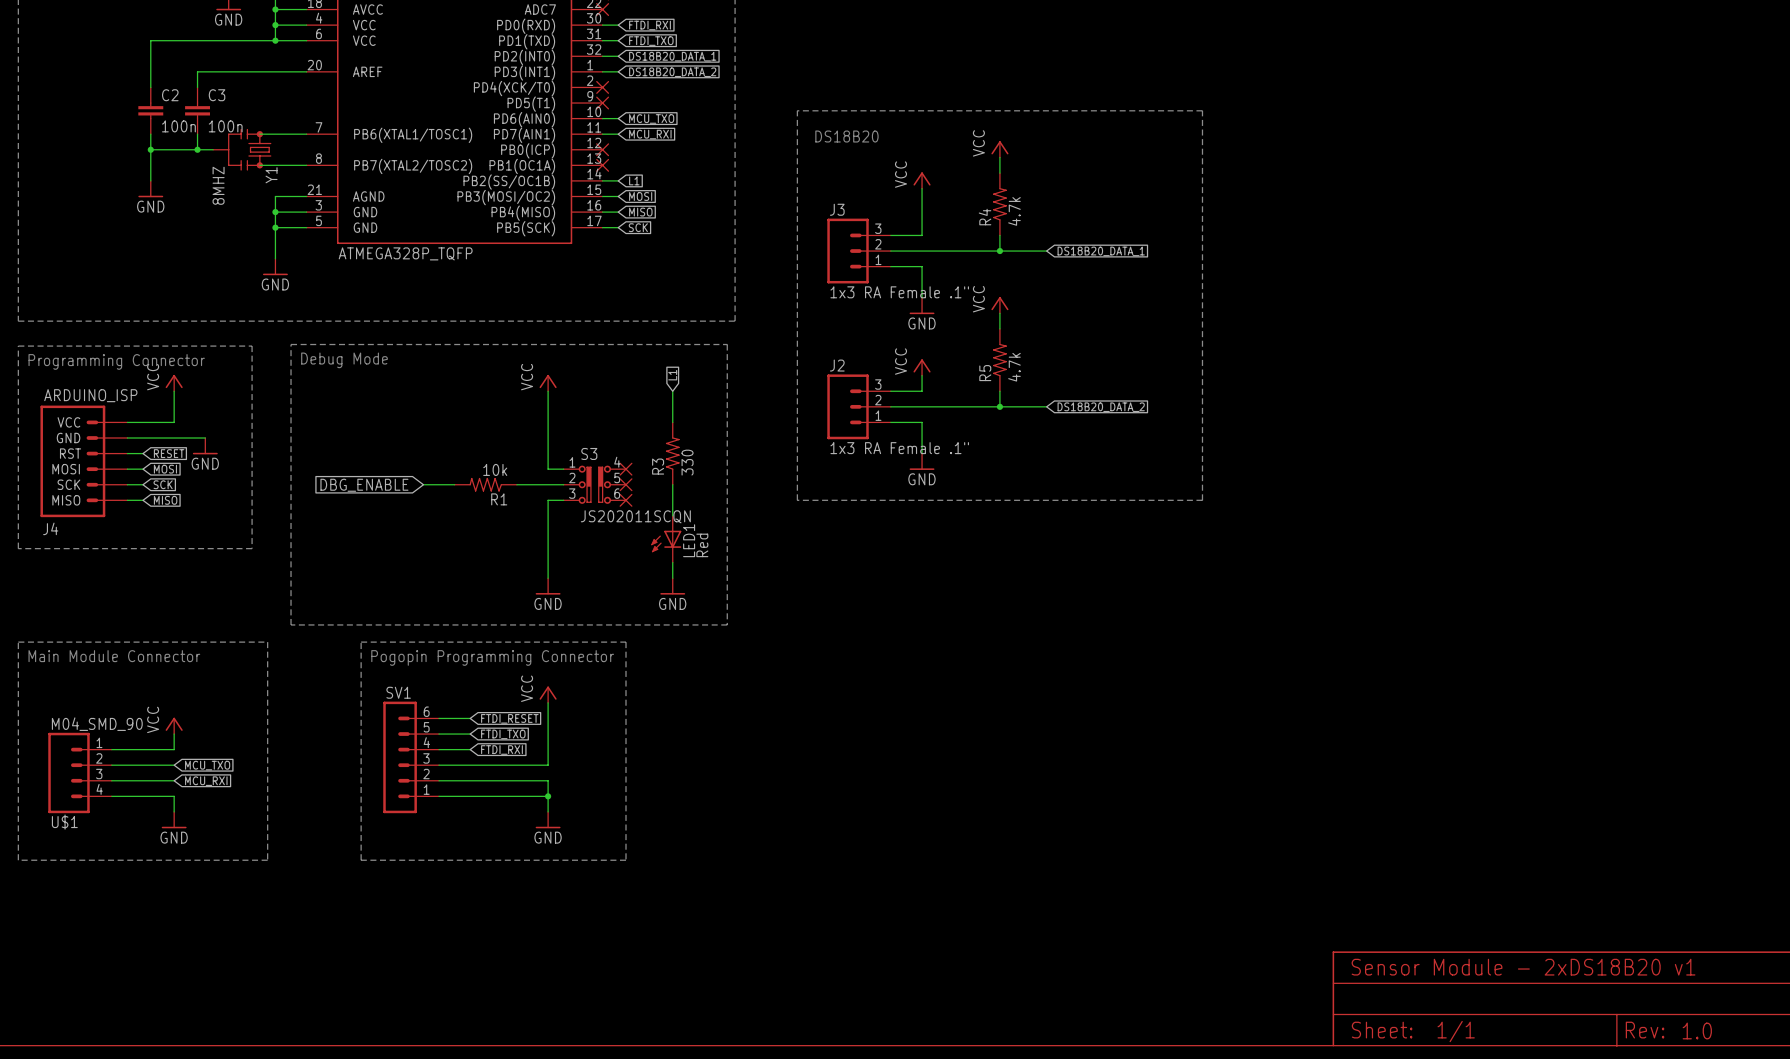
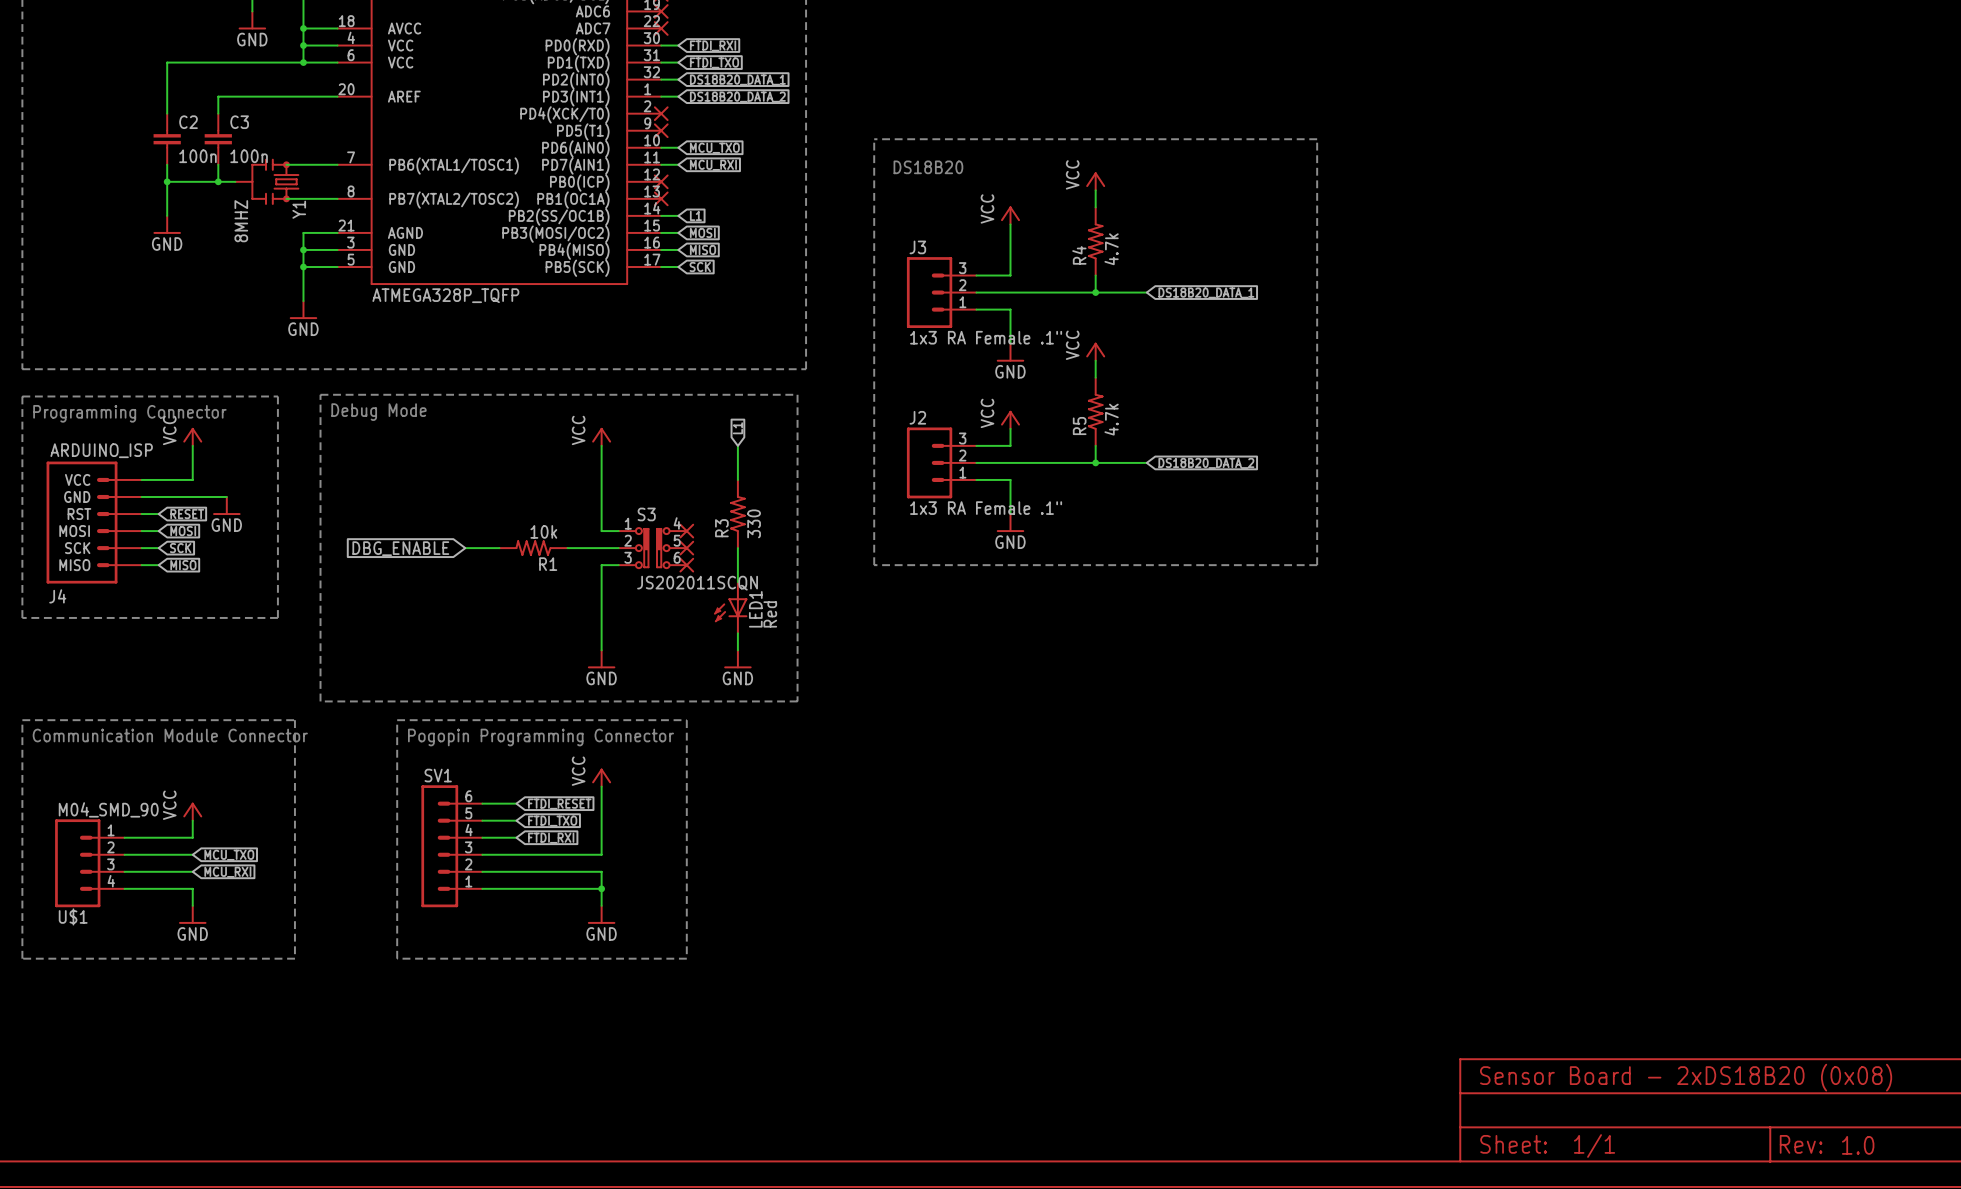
text: Main Module Connector (114, 656) -> Communication Module Connector (170, 735)
text: Sensor Module - 2xDS18B20 v1 (1523, 967) -> Sensor Board - 2xDS18B20 (0x08) (1686, 1077)

